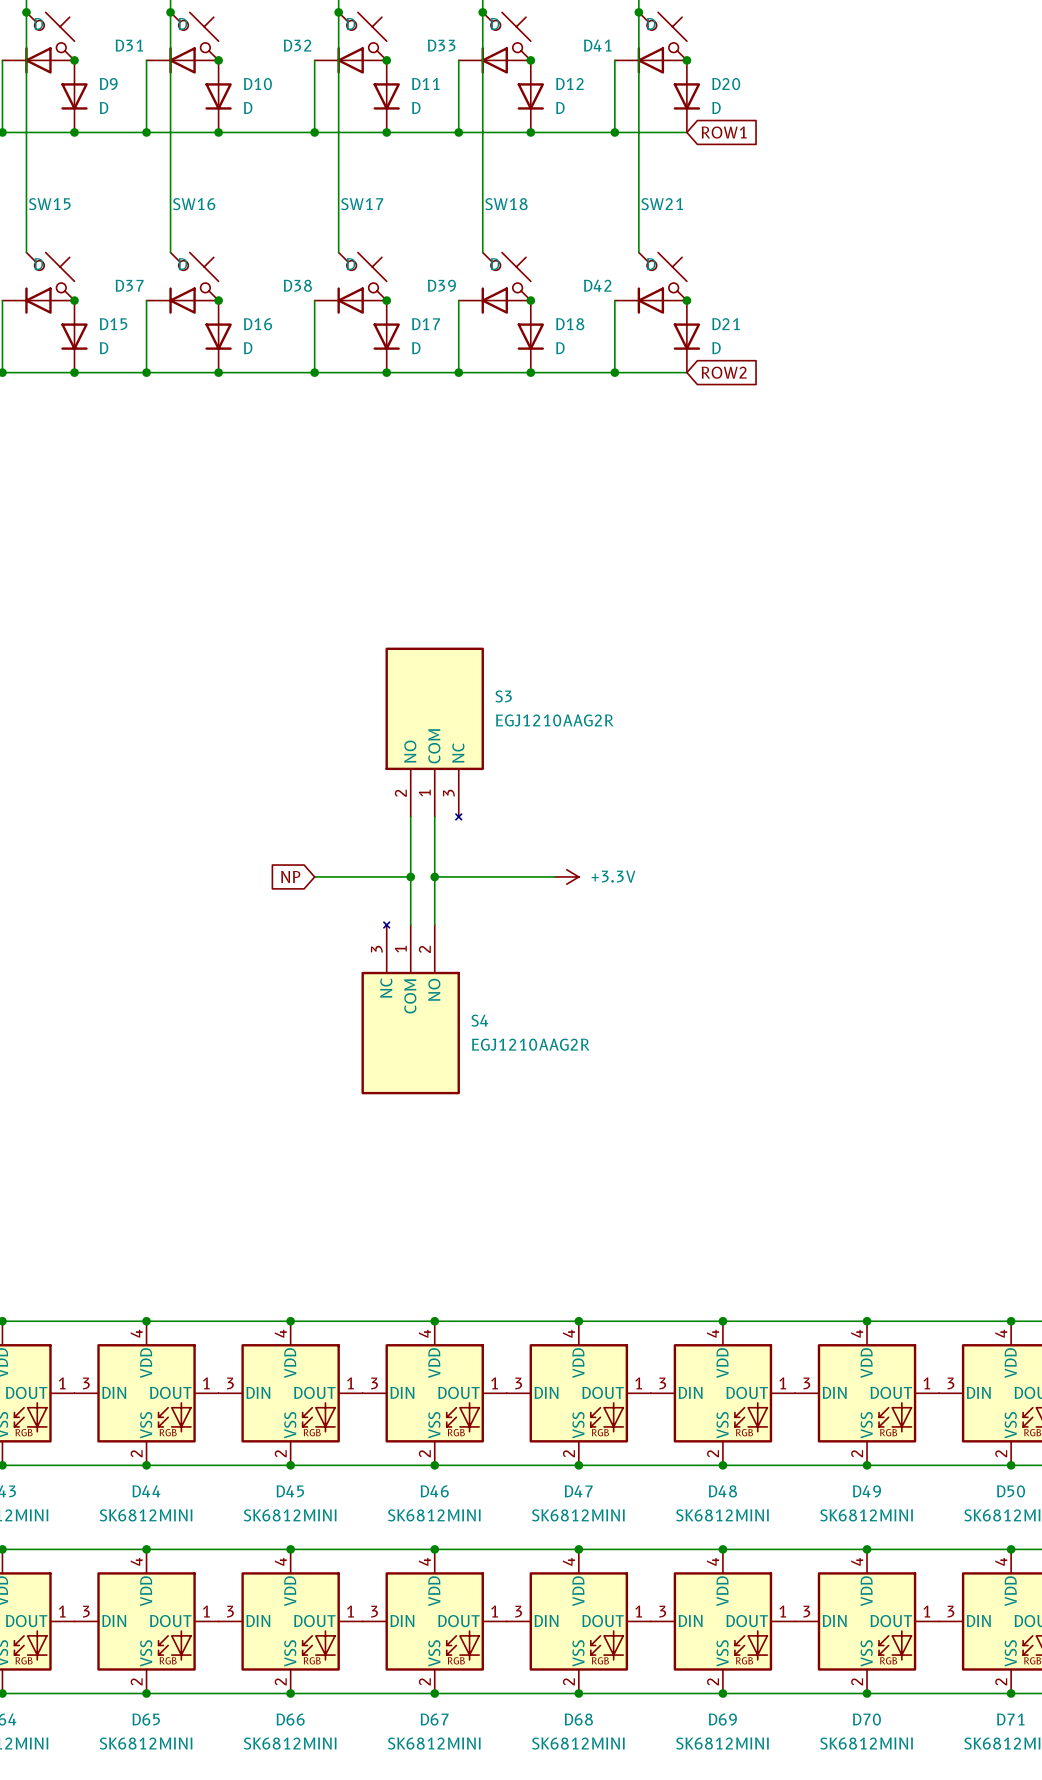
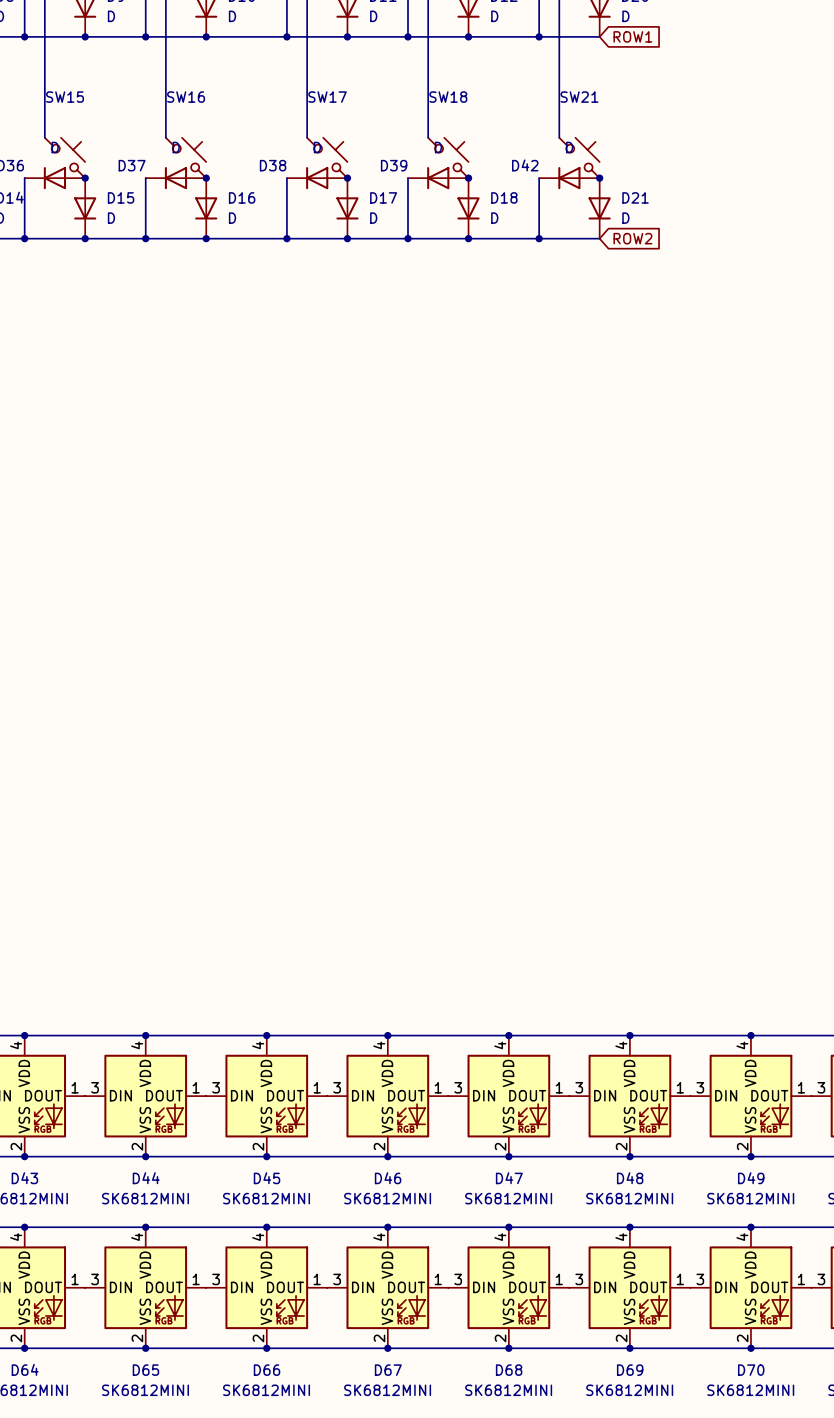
S3: EGJ1210AAG2R (434, 733) -> none
wire: (410, 816) (410, 924) -> none
wire: (434, 816) (434, 924) -> none
global label: NP (290, 876) -> none
wire: (314, 876) (410, 876) -> none
junction: (410, 876) -> none
wire: (434, 876) (554, 876) -> none
junction: (434, 876) -> none
power symbol: +3.3V (566, 876) -> none
S4: EGJ1210AAG2R (410, 1008) -> none

